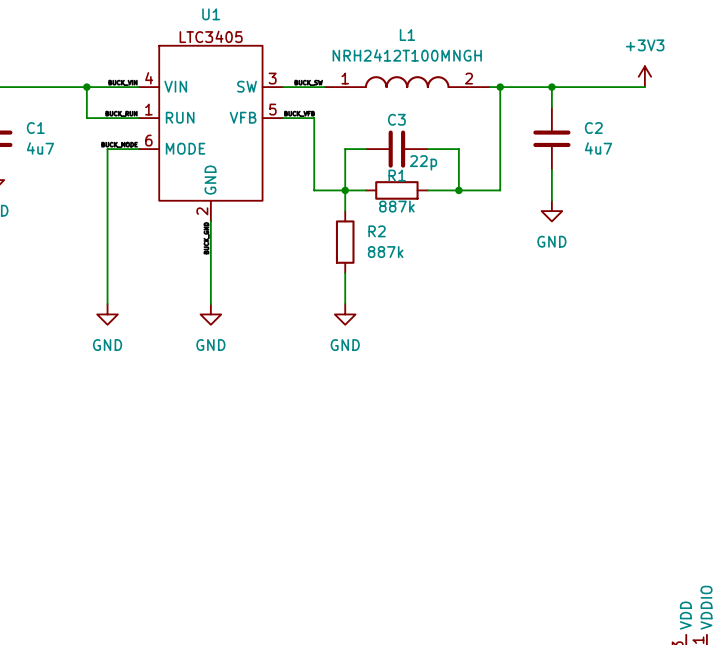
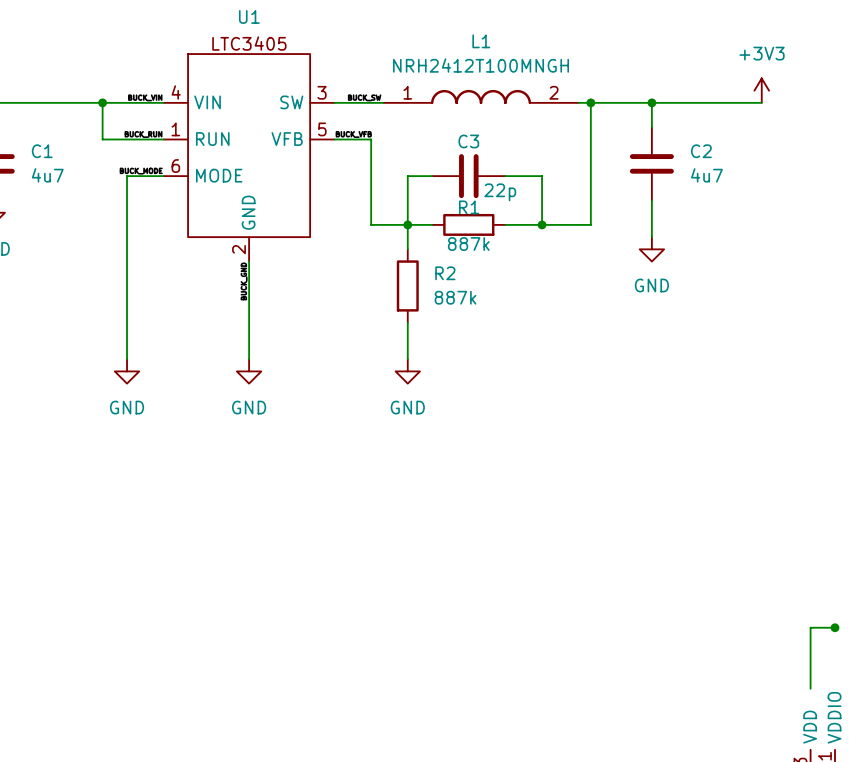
wire: none -> (834, 627) (810, 627) (810, 688)
junction: none -> (834, 627)

